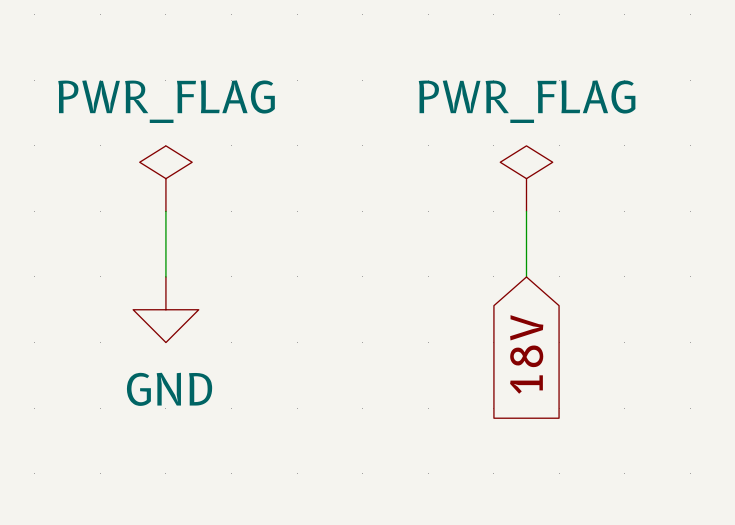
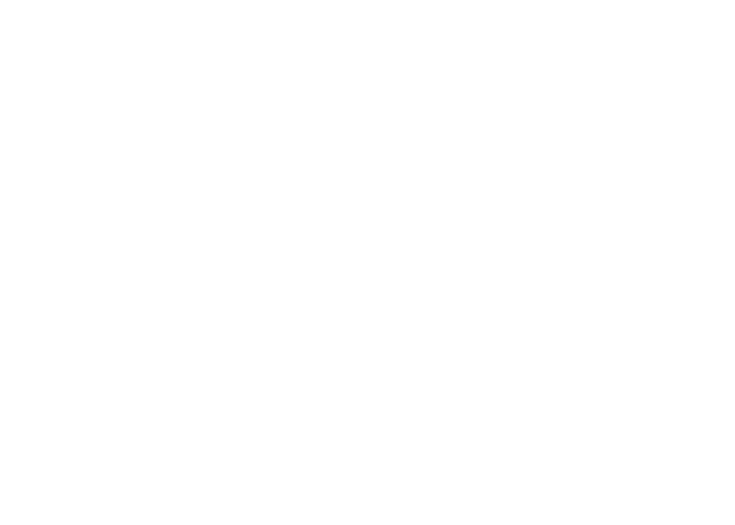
power symbol: PWR_FLAG (165, 178) -> none
power symbol: PWR_FLAG (526, 178) -> none
wire: (165, 211) (165, 276) -> none
wire: (526, 211) (526, 276) -> none
power symbol: GND (165, 309) -> none
global label: 18V (526, 354) -> none

